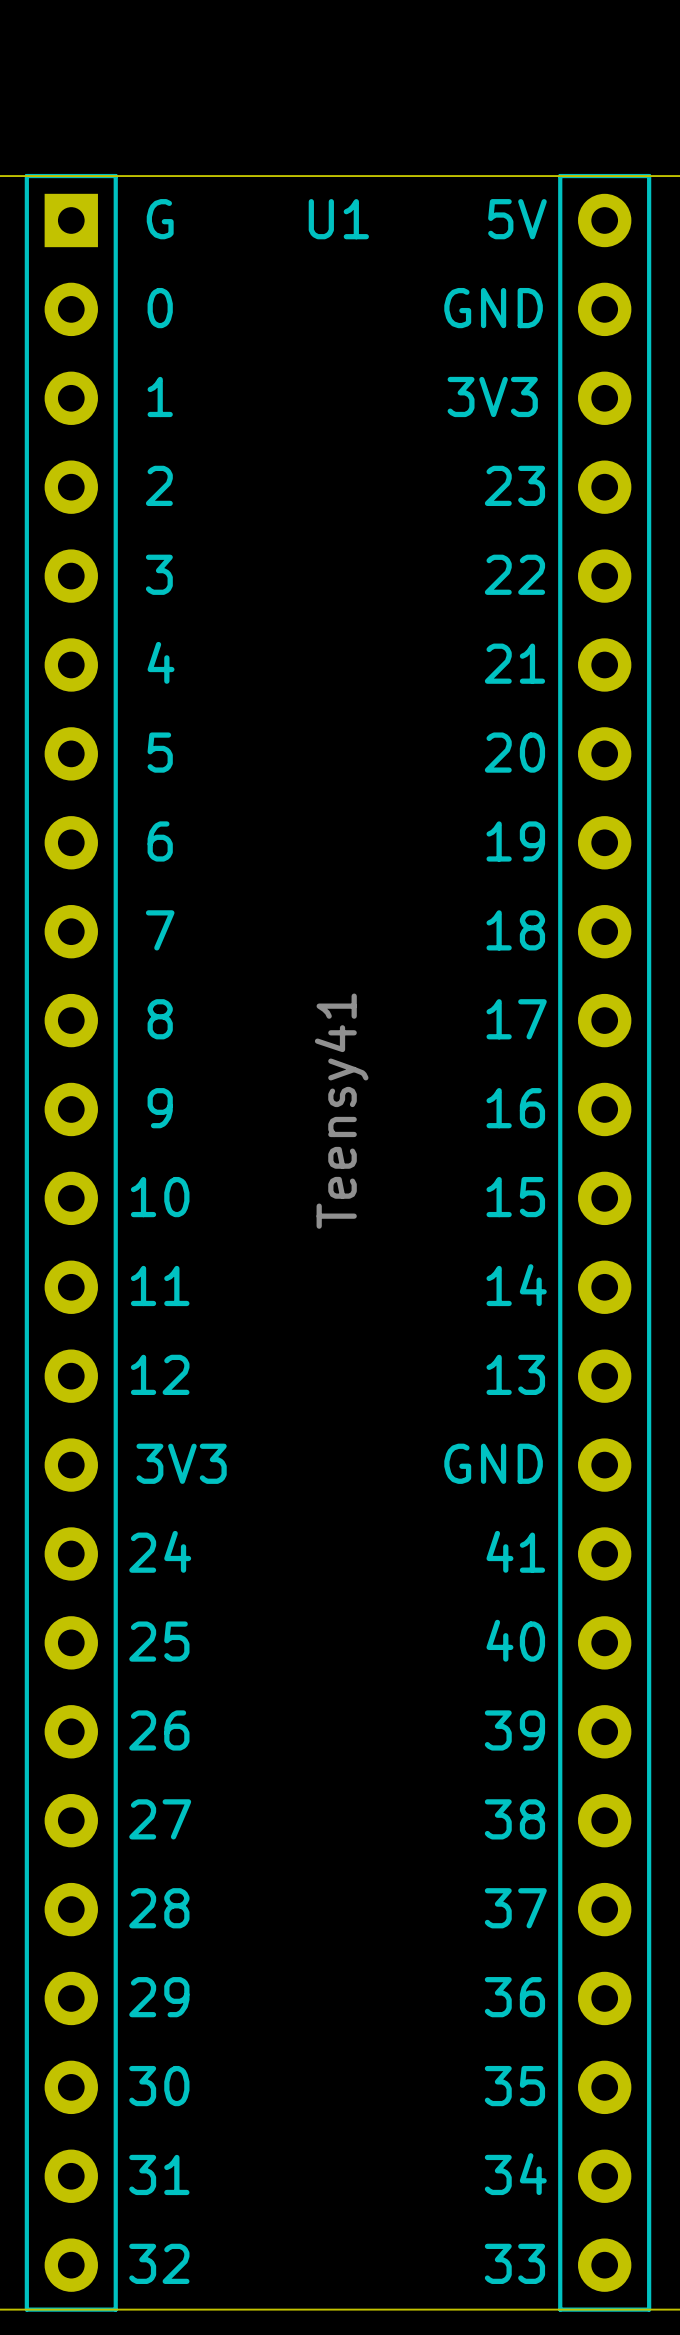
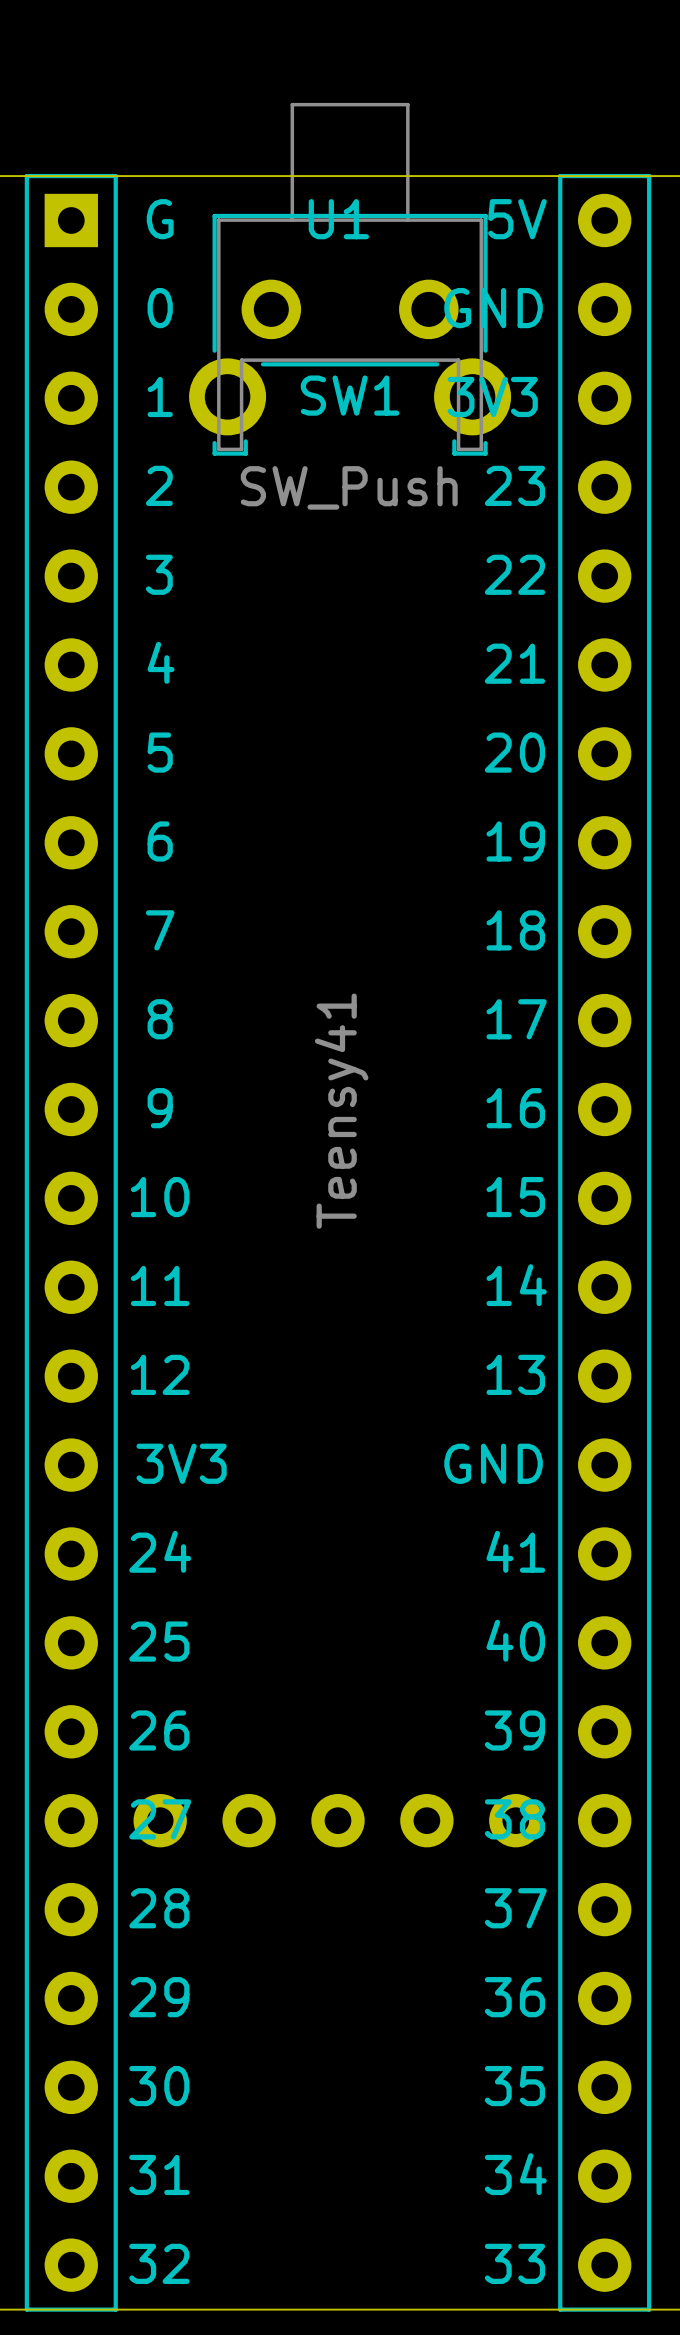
U1 footprint: [24, 173, 652, 2312] -> [24, 173, 652, 2312]
SW1: none -> SW_Push (350, 279)

